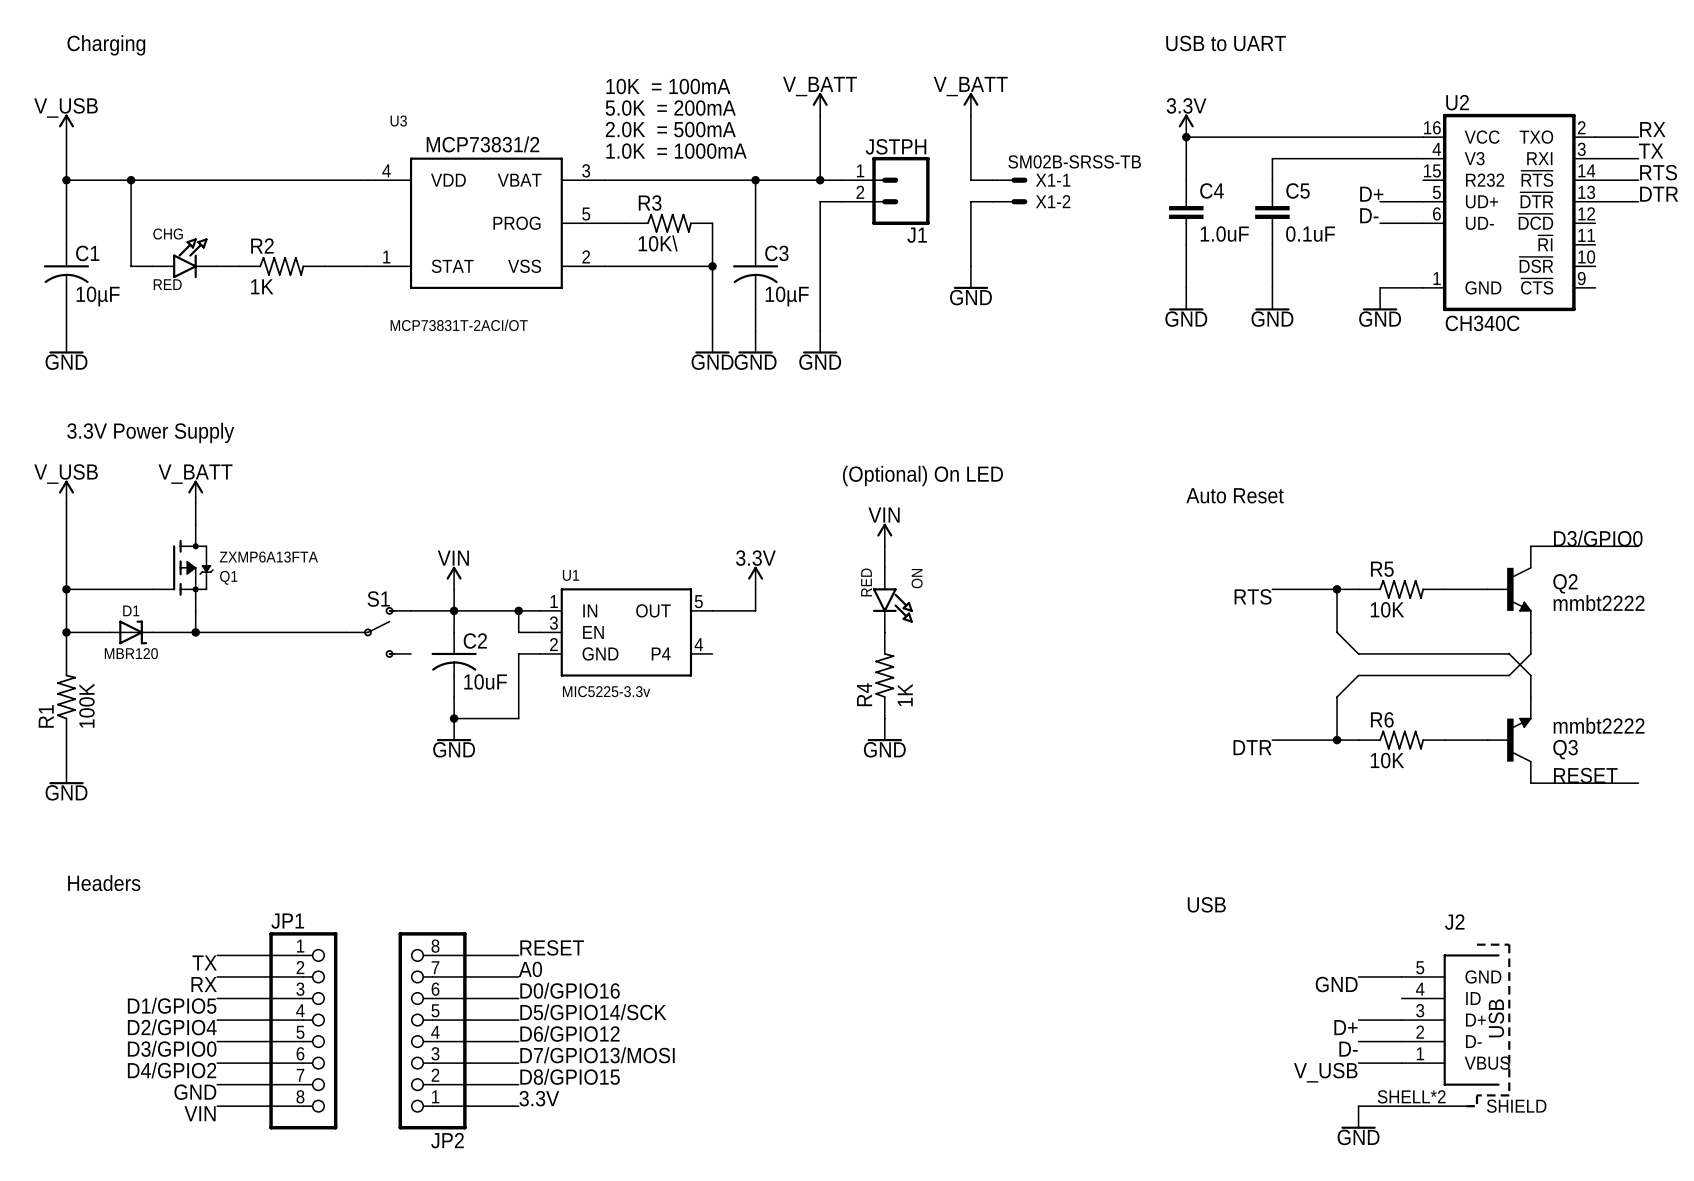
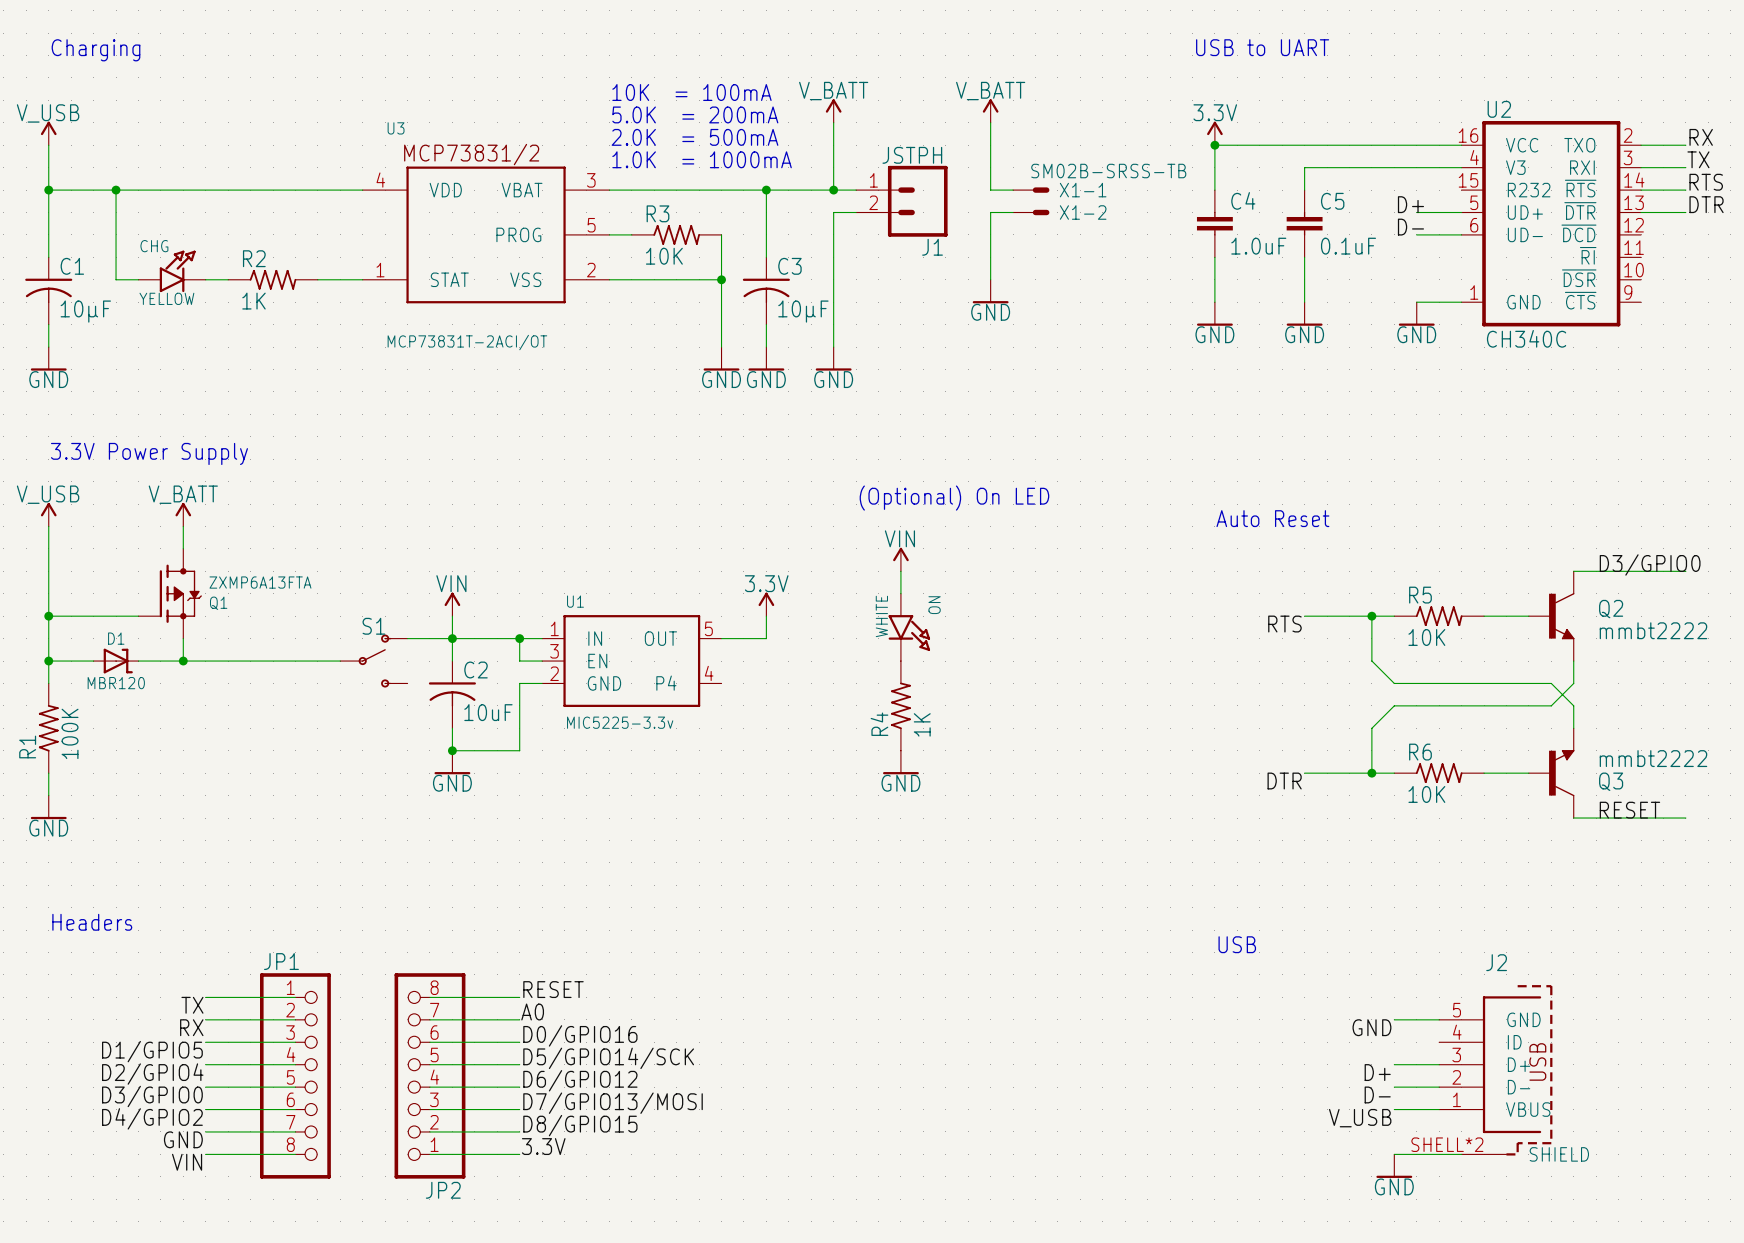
R3 value: 10K\ (658, 243) -> 10K (664, 256)
CHG value: RED (167, 284) -> YELLOW (166, 298)
ON value: RED (866, 582) -> WHITE (881, 616)

